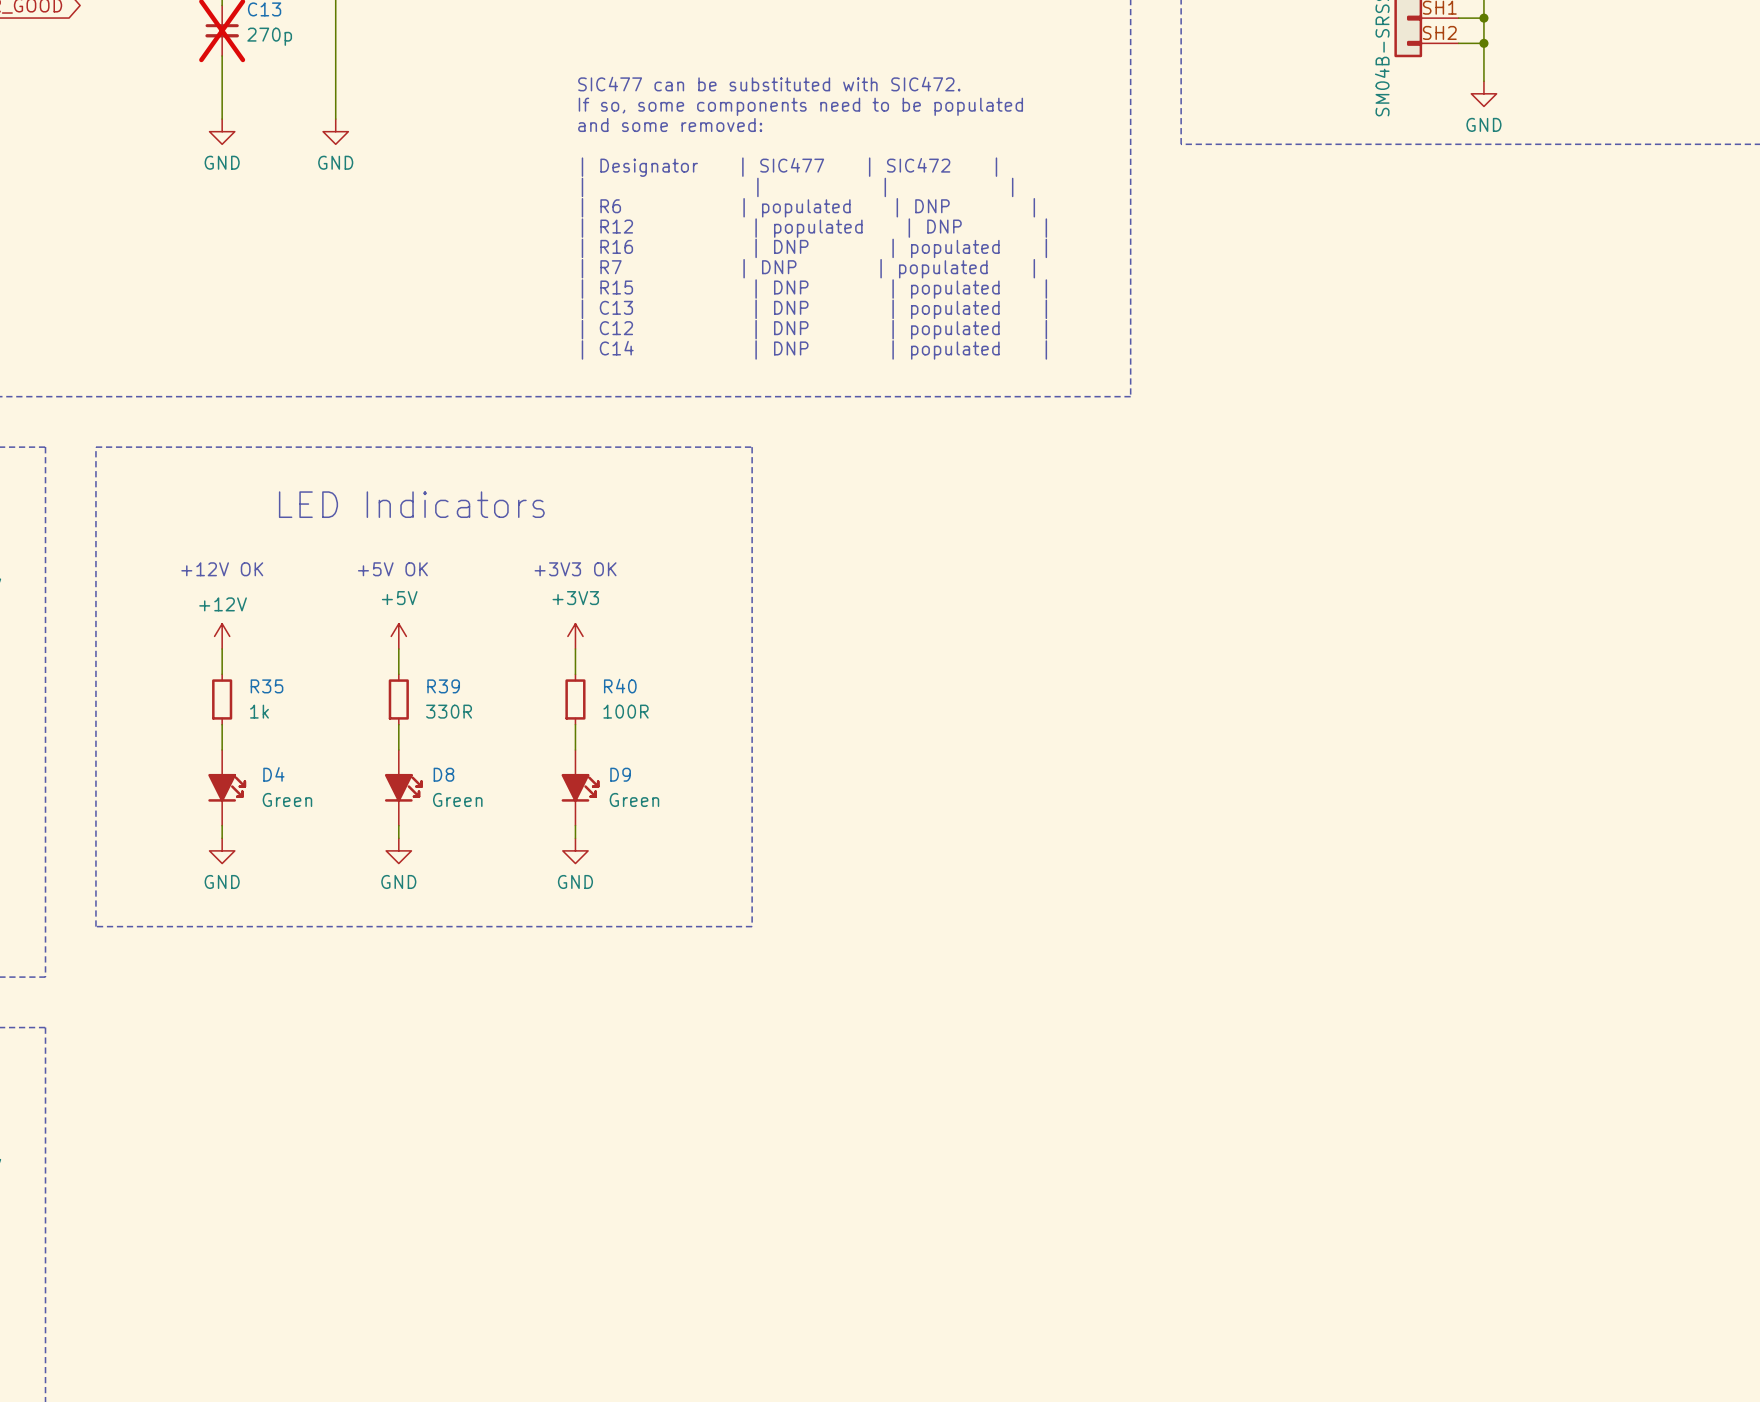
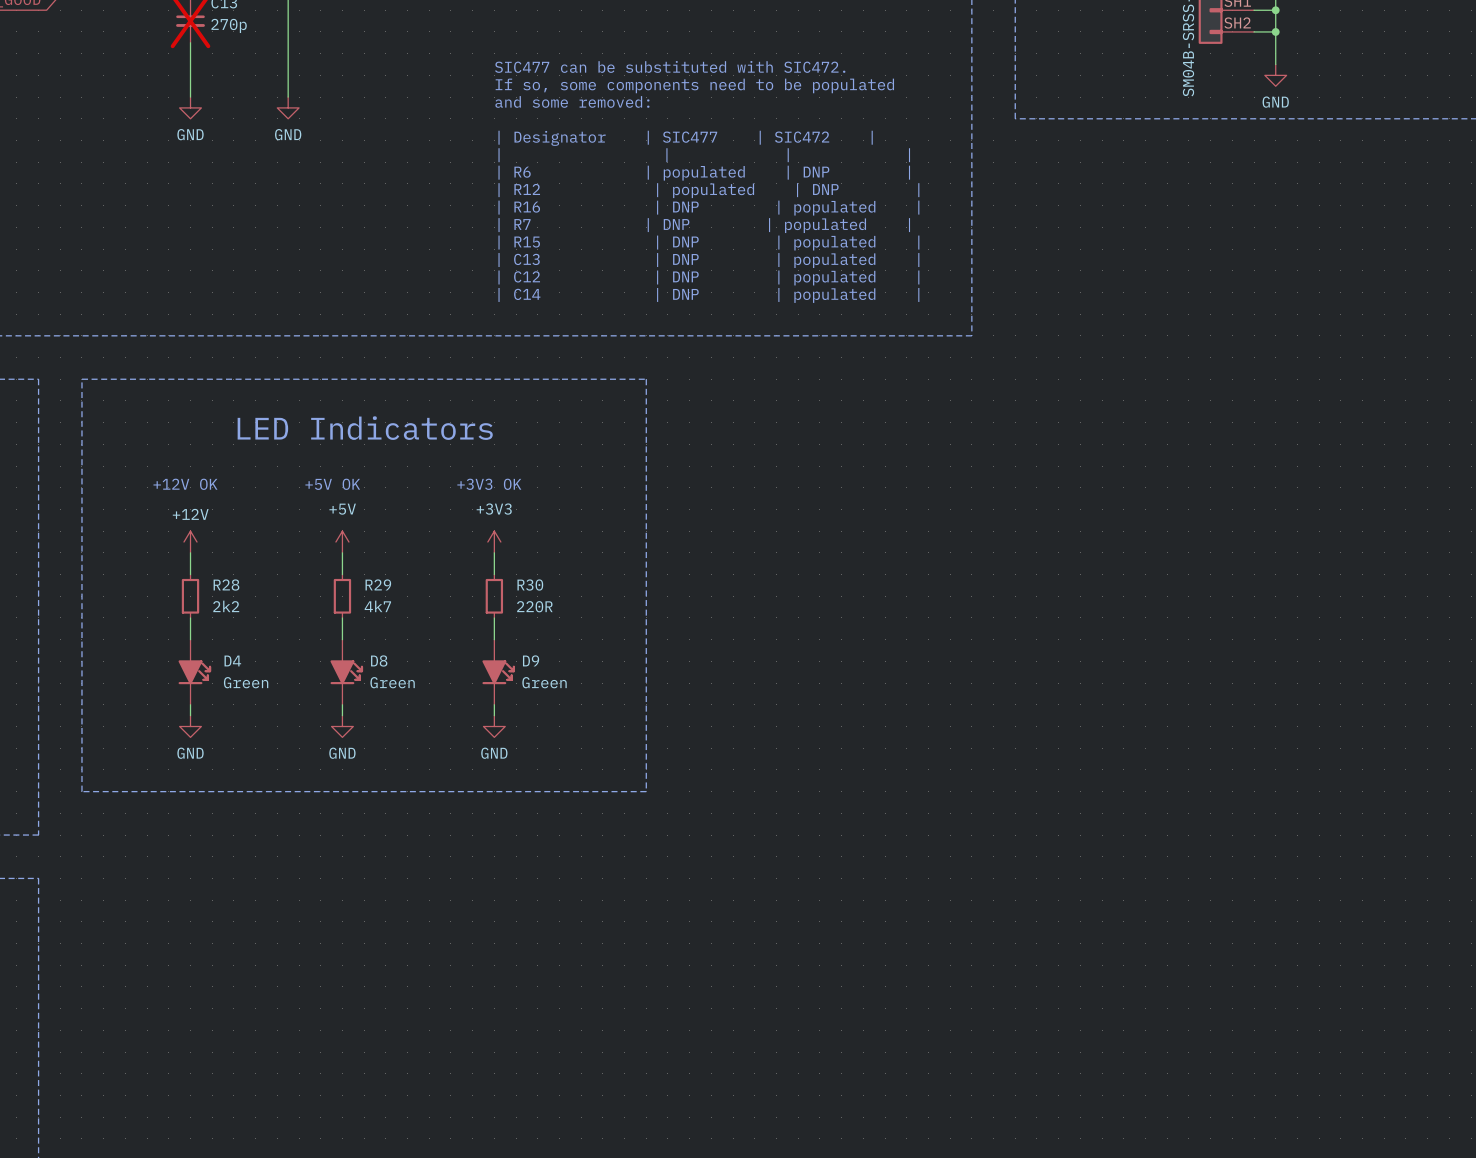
R35 name: R35 (267, 686) -> R28 (226, 585)
R39 name: R39 (443, 686) -> R29 (378, 584)
R40 name: R40 (620, 686) -> R30 (530, 585)
R35 text: 1k (259, 711) -> 2k2 (226, 606)
R39 text: 330R (449, 711) -> 4k7 (377, 606)
R40 text: 100R (626, 711) -> 220R (534, 606)

